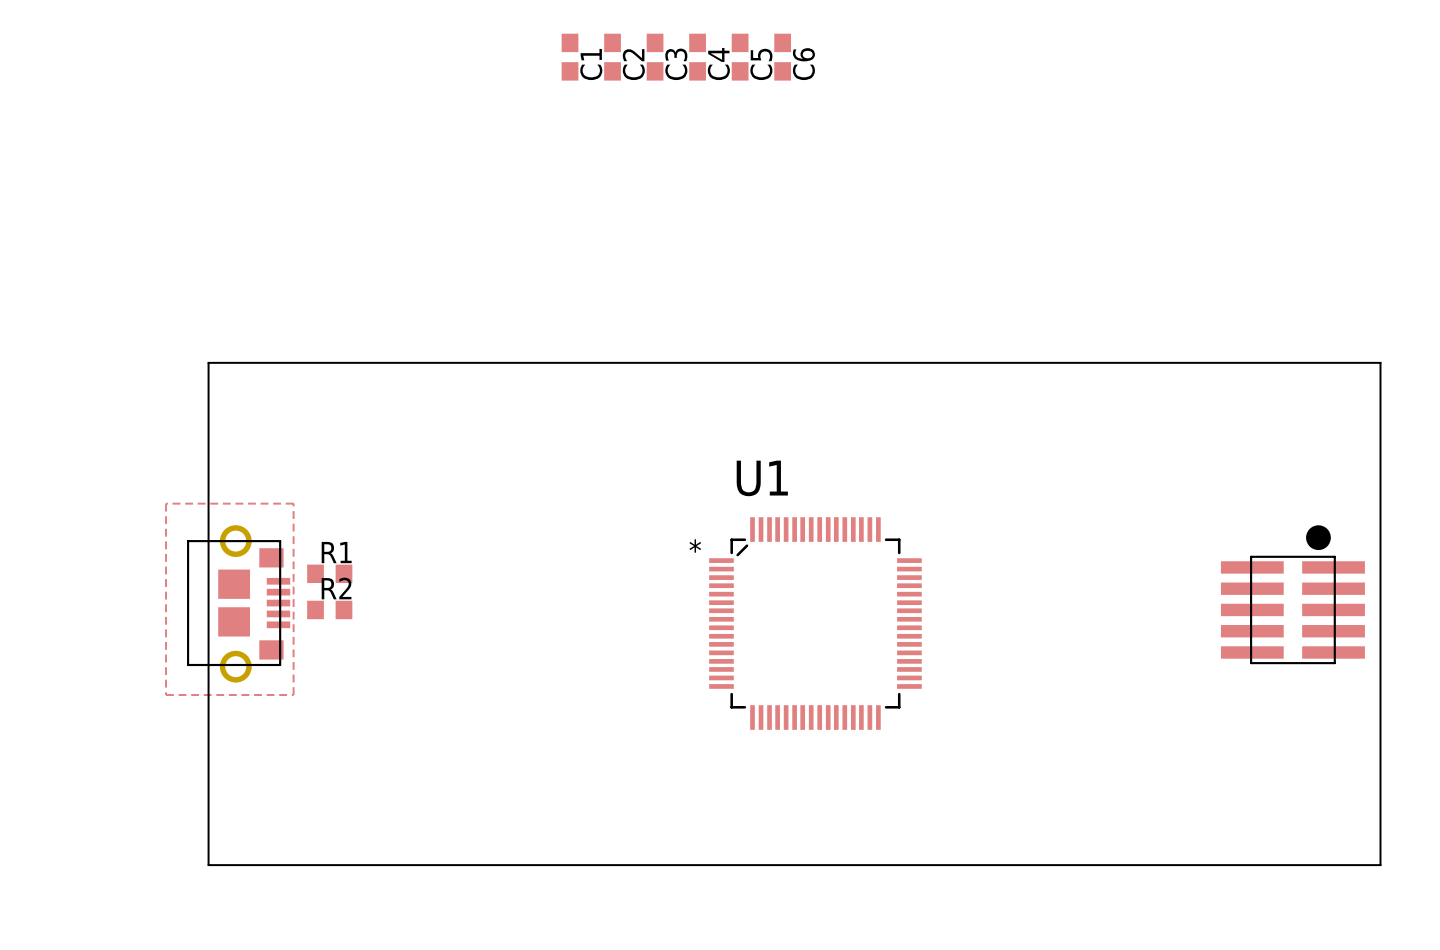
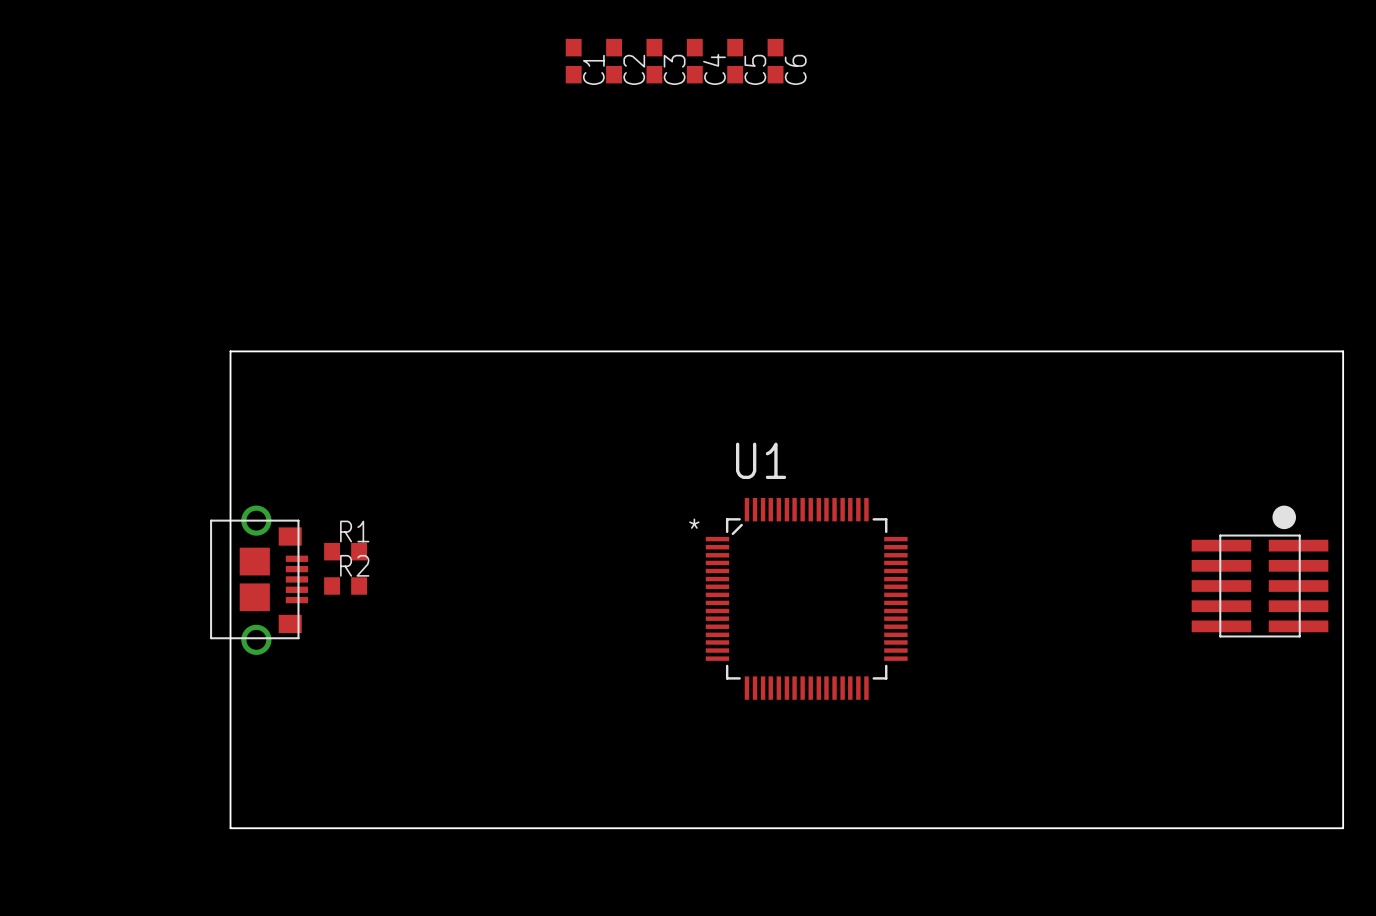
zone outline: (166, 503) (166, 695) (293, 695) (293, 503) (166, 503) -> none

